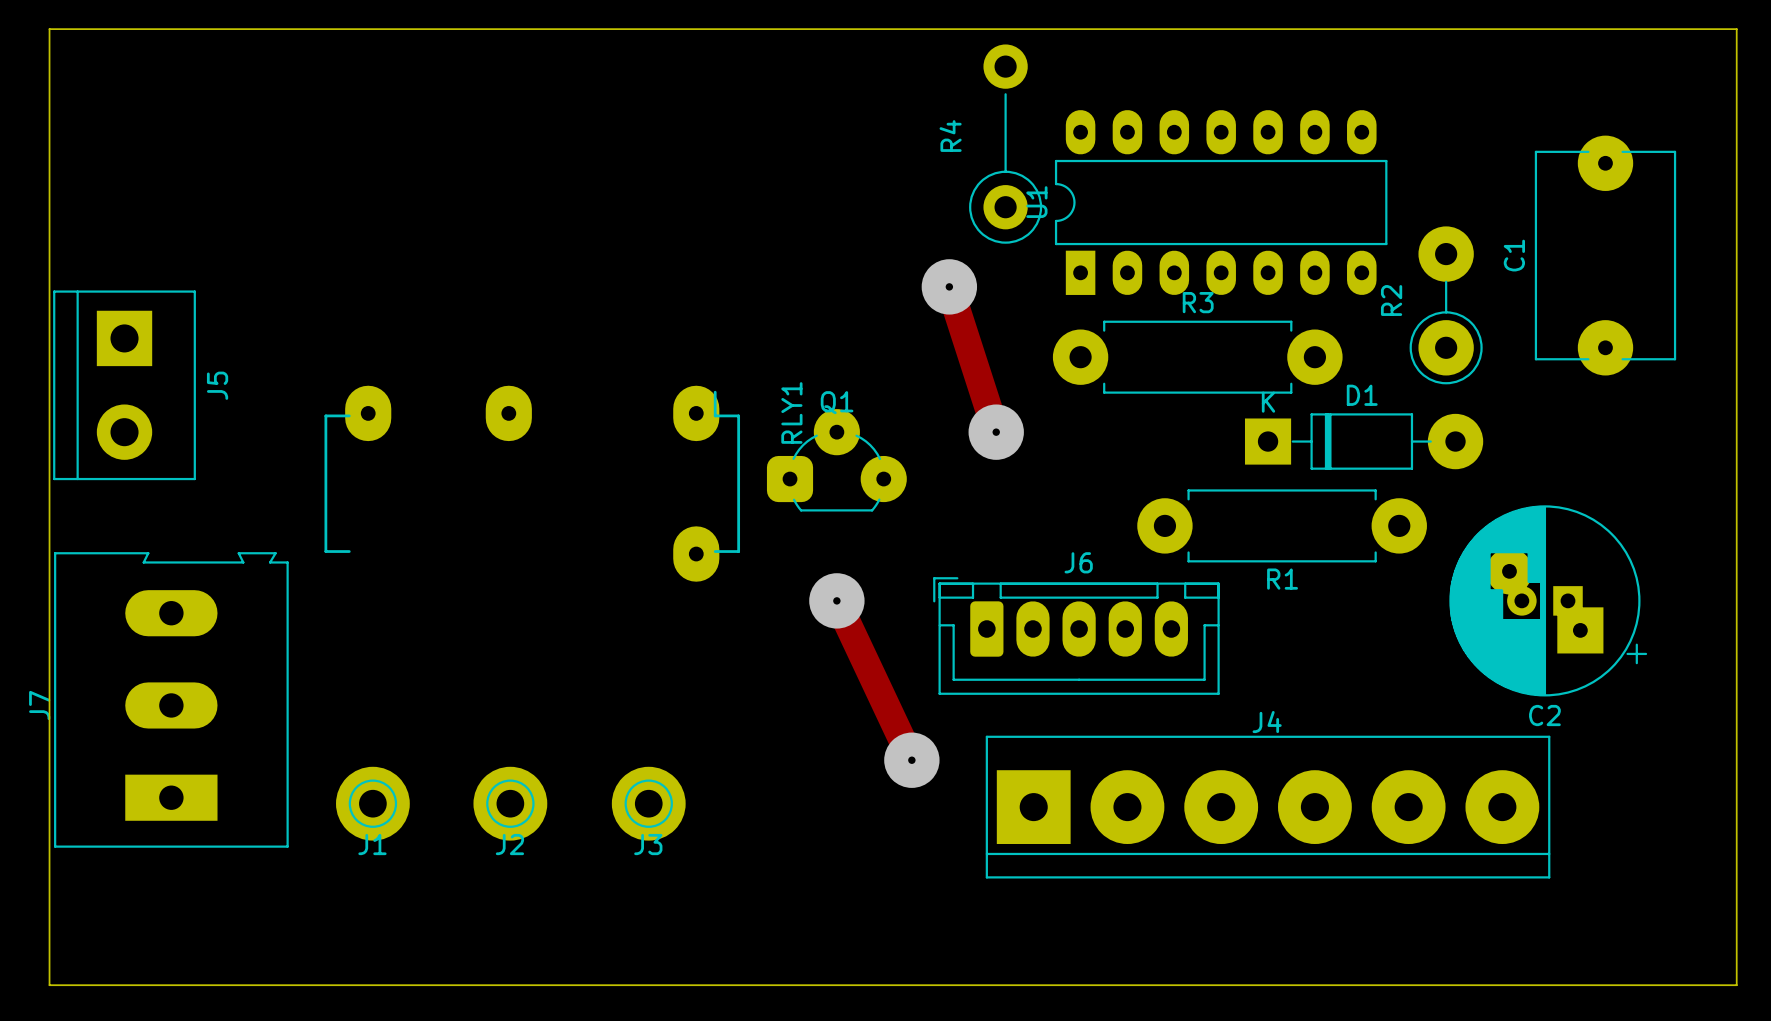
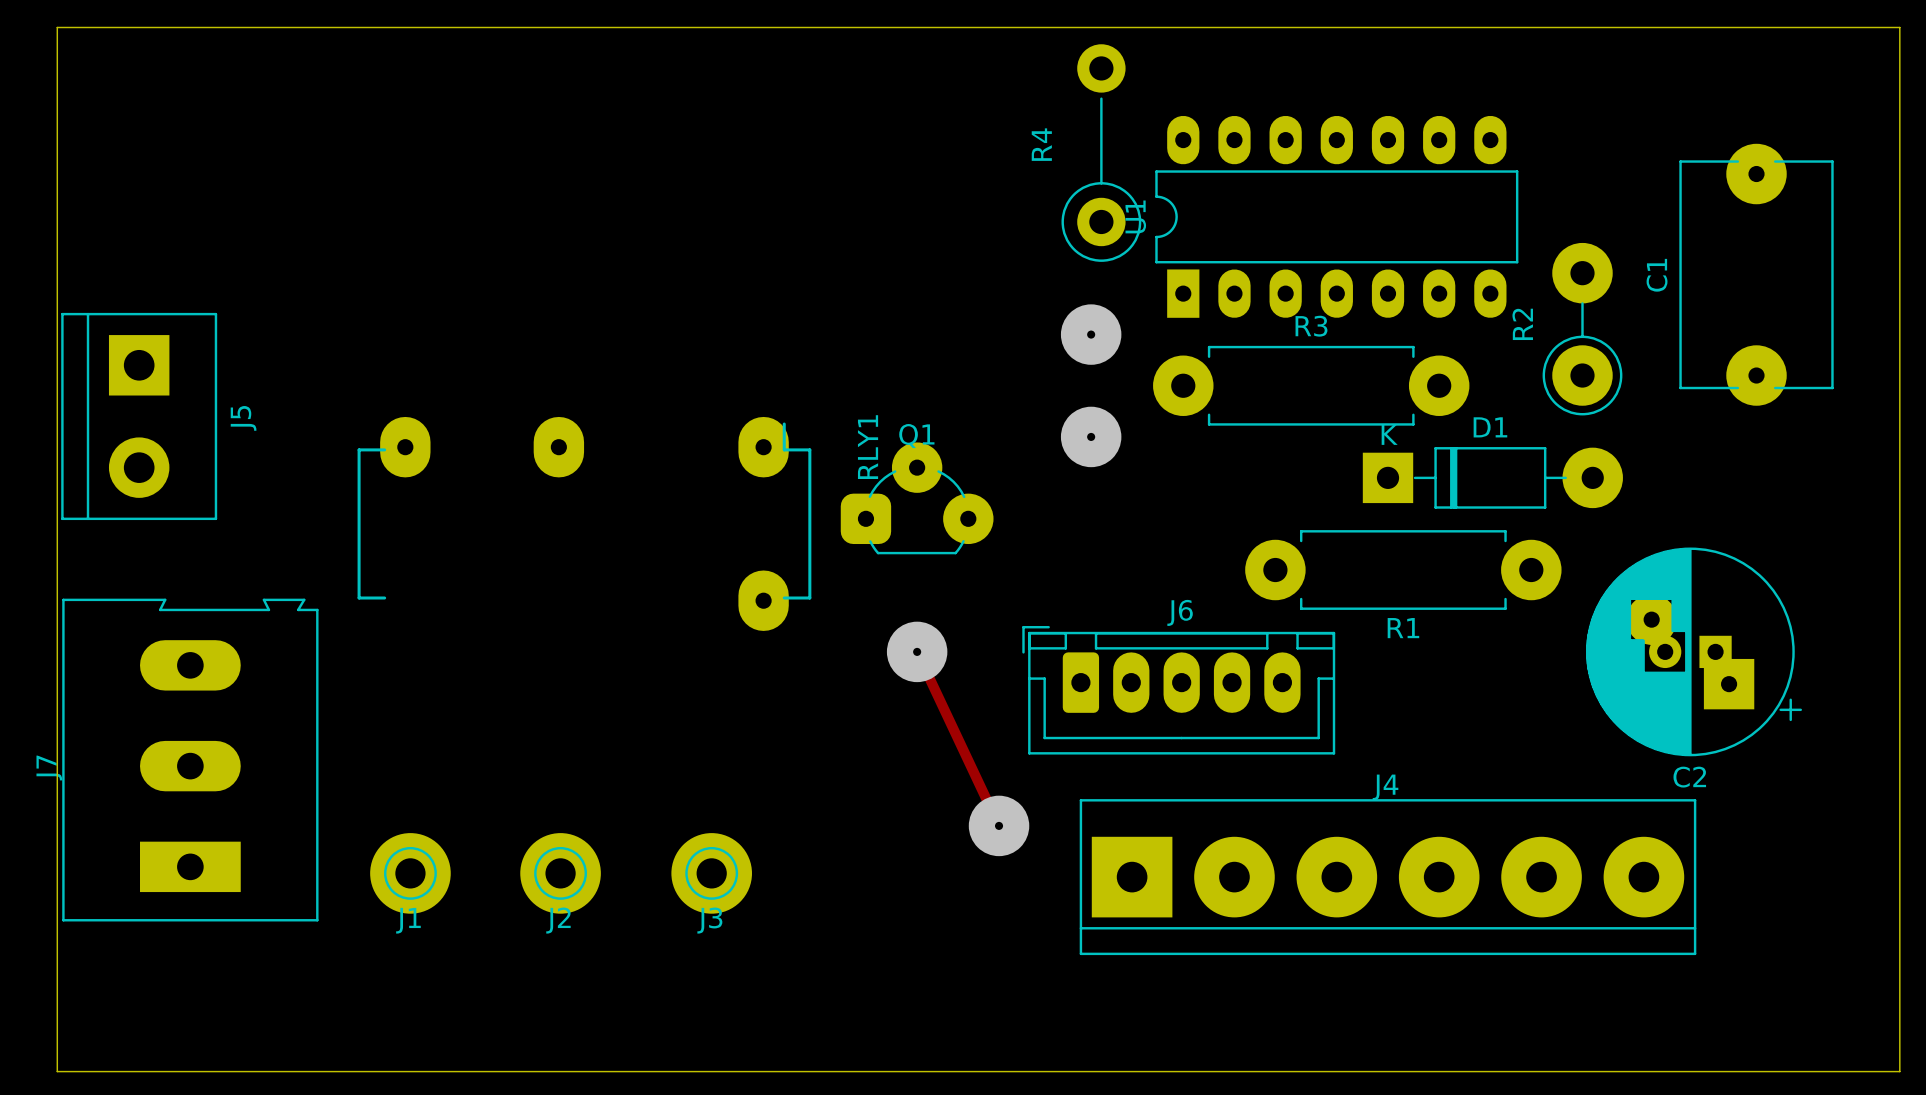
track: (949, 286) (996, 432) -> none
via position: (949, 286) -> (1091, 334)
via position: (996, 432) -> (1091, 436)
track width: thick (836, 600) (911, 760) -> thin (917, 651) (999, 825)

